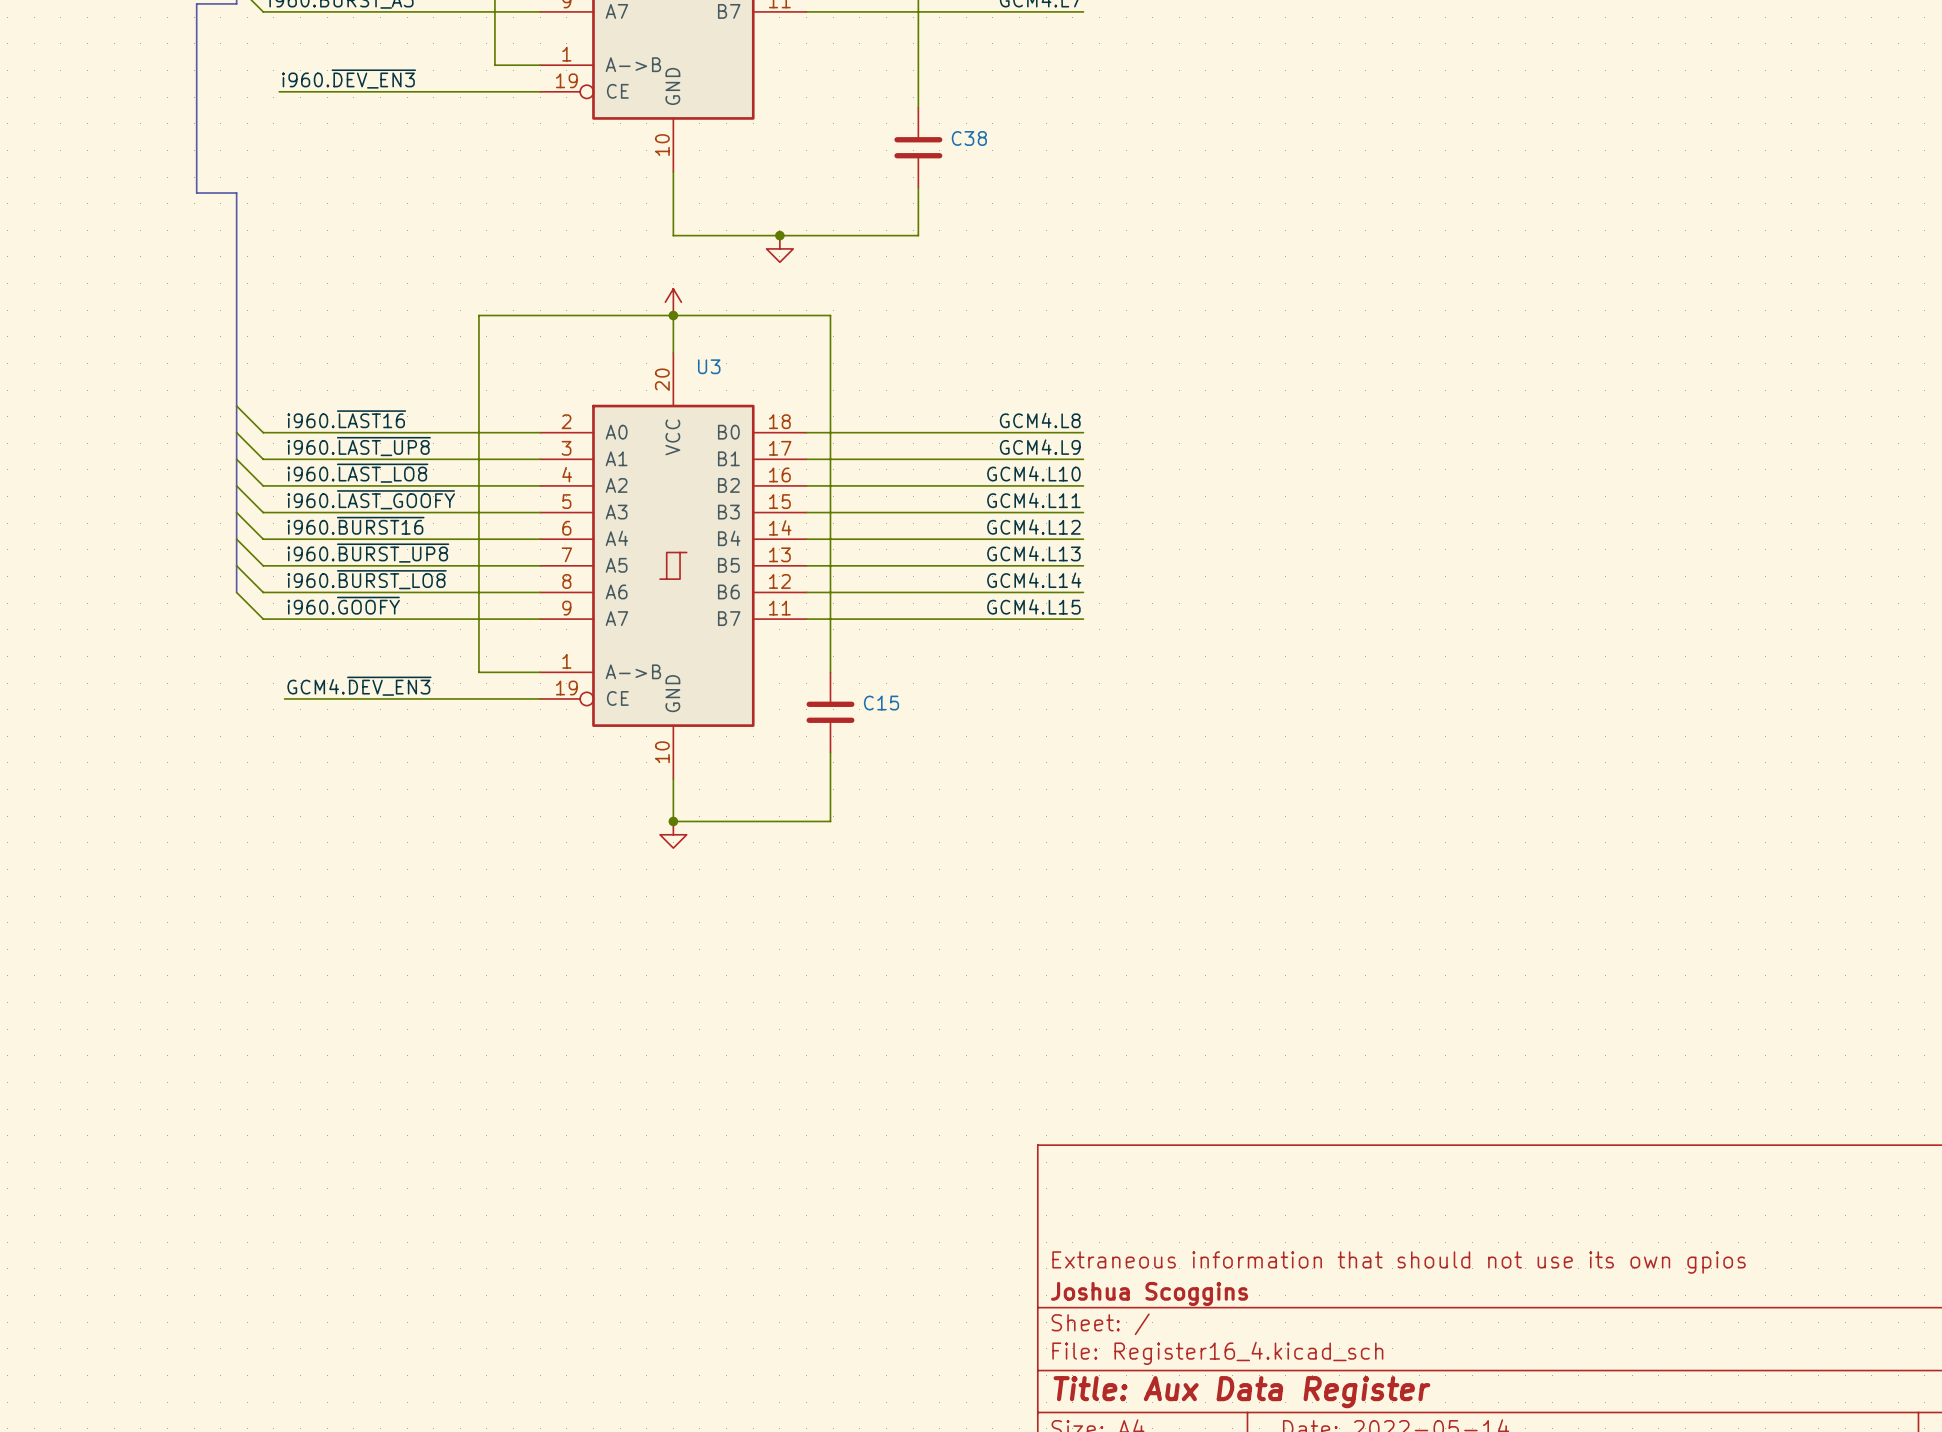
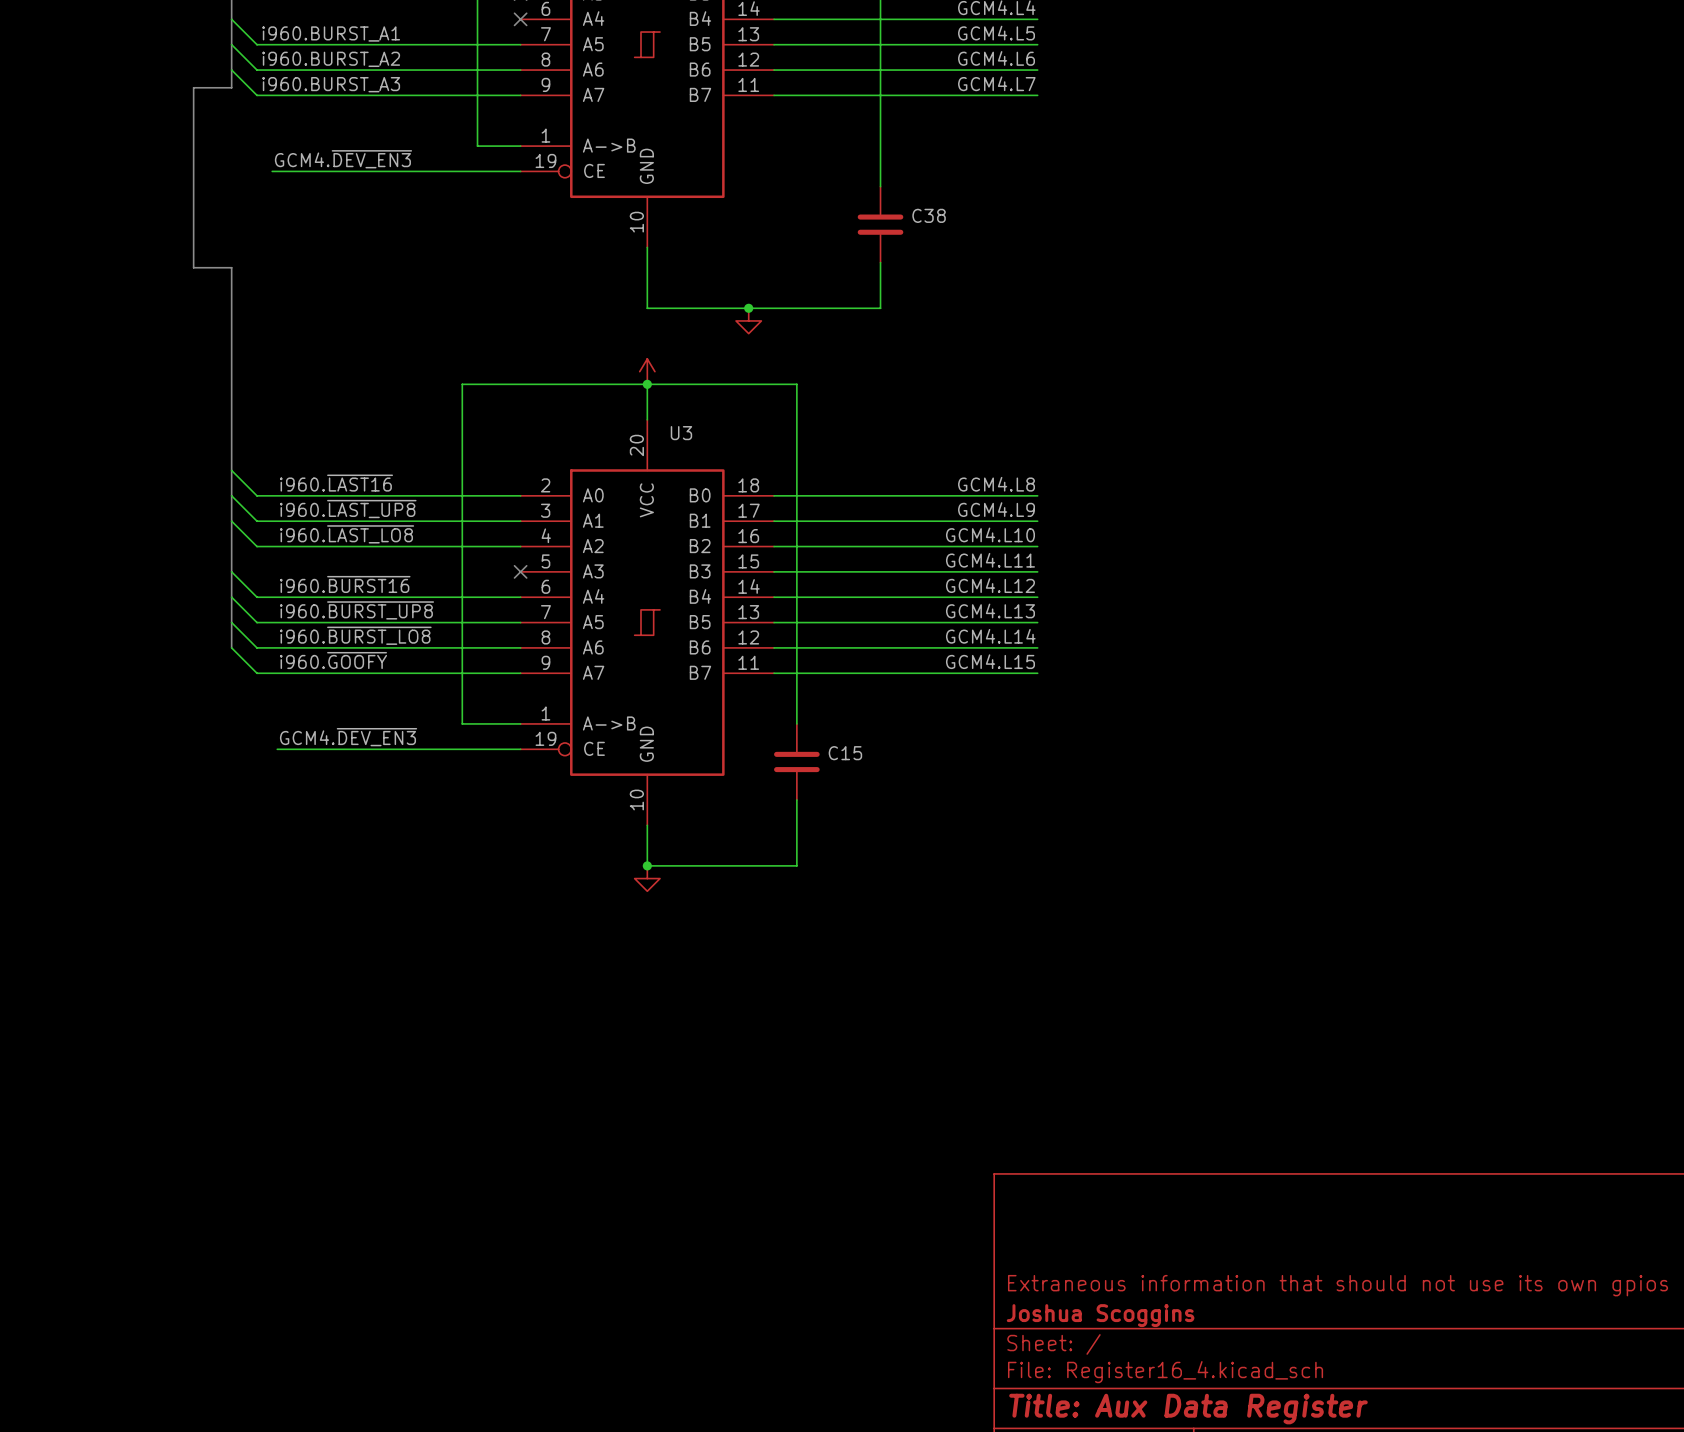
label: i960.~{DEV_EN3} (349, 79) -> GCM4.~{DEV_EN3} (343, 159)
wire: (236, 485) (263, 512) (540, 512) -> none
label: i960.~{LAST_GOOFY} (371, 499) -> none
no-connect mark: none -> (520, 571)

